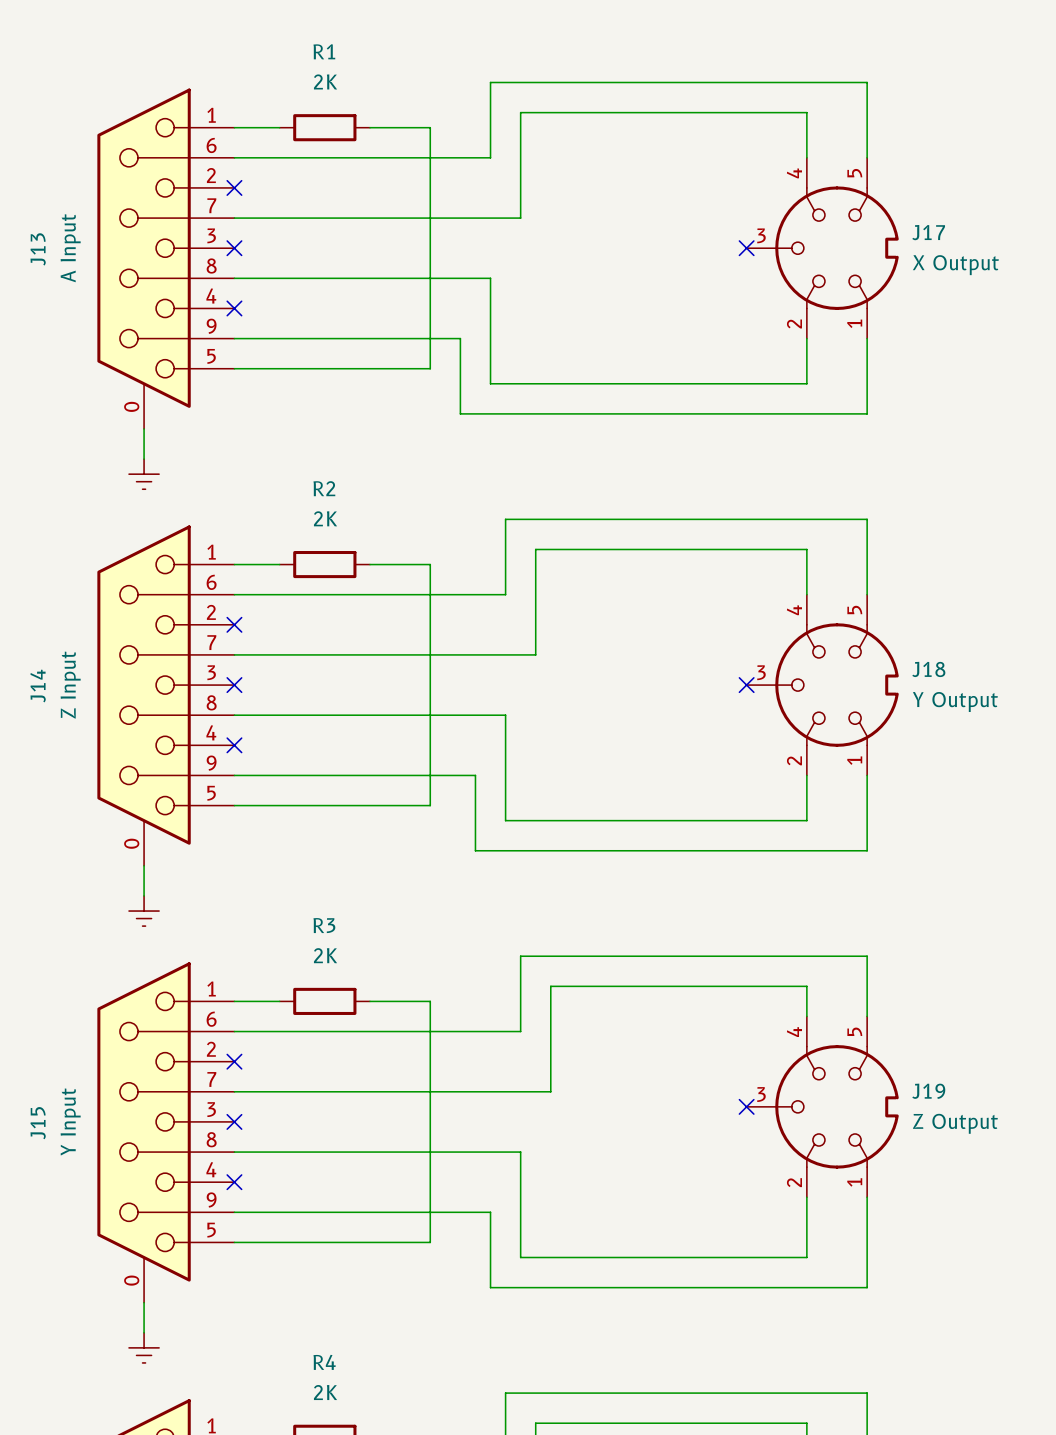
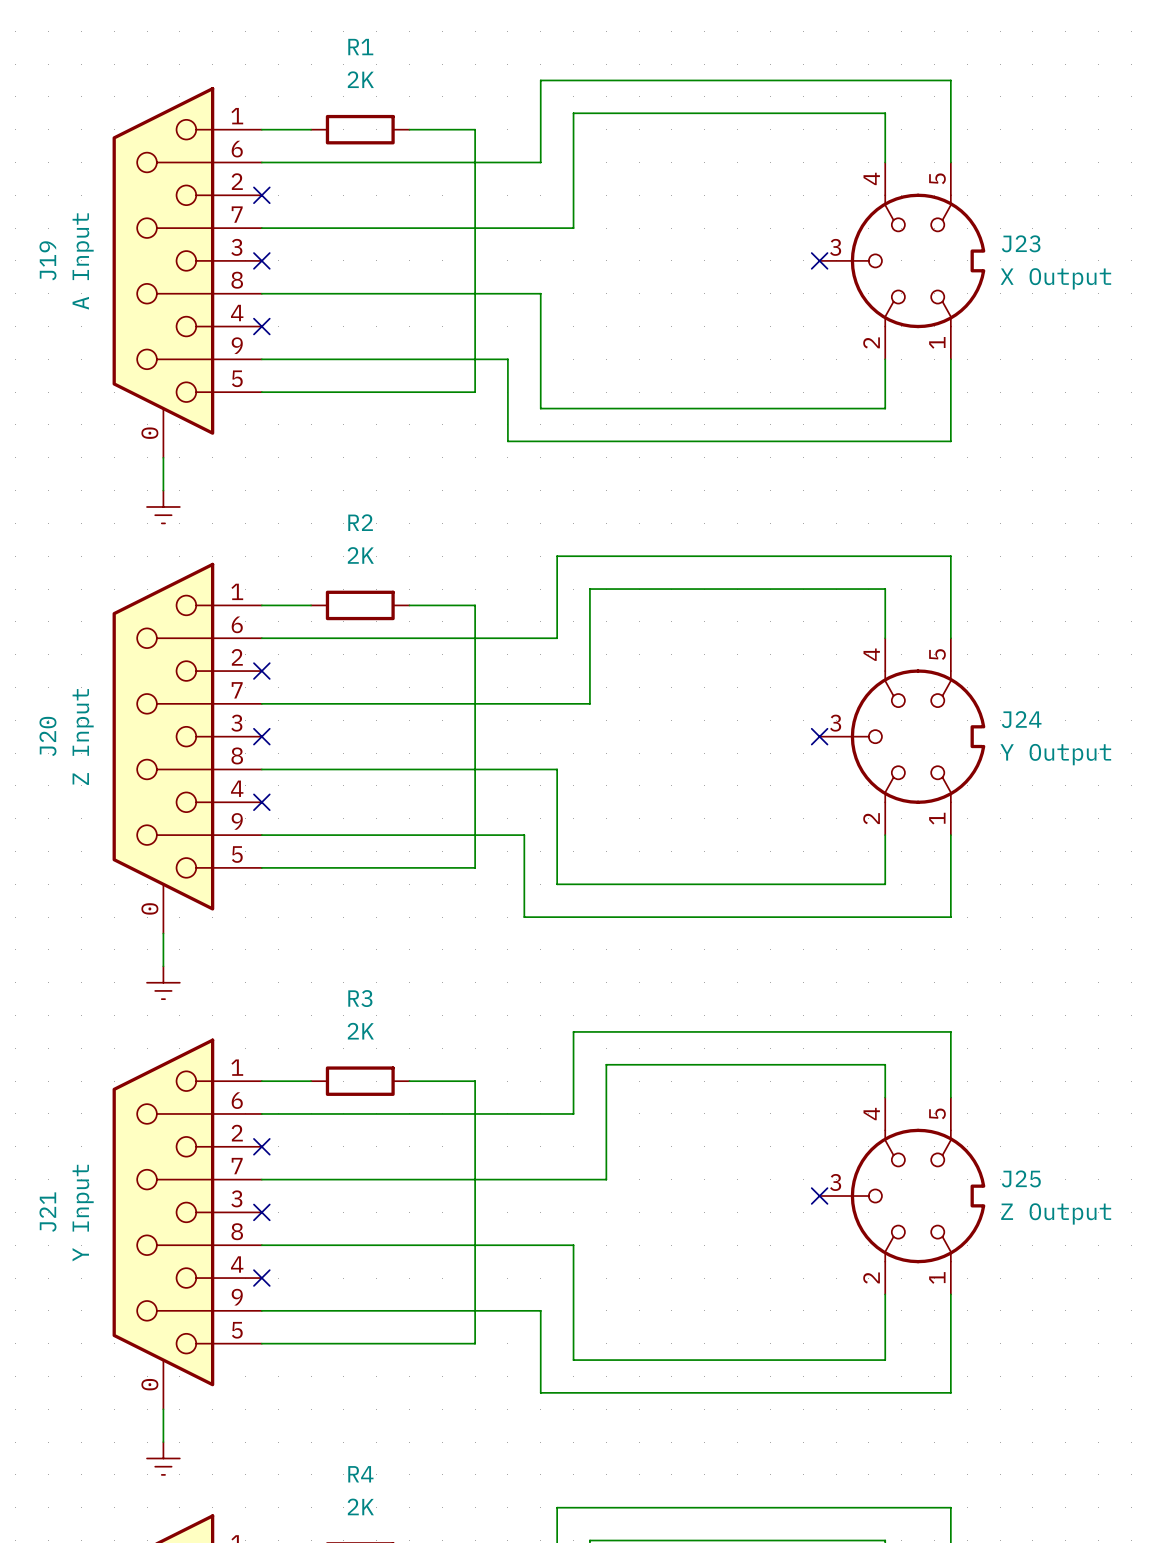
J17 name: J17 (928, 232) -> J23 (1021, 243)
J13 name: J13 (38, 249) -> J19 (47, 260)
J18 name: J18 (928, 669) -> J24 (1021, 719)
J14 name: J14 (38, 686) -> J20 (47, 736)
J19 name: J19 (928, 1091) -> J25 (1021, 1178)
J15 name: J15 (38, 1123) -> J21 (47, 1212)

